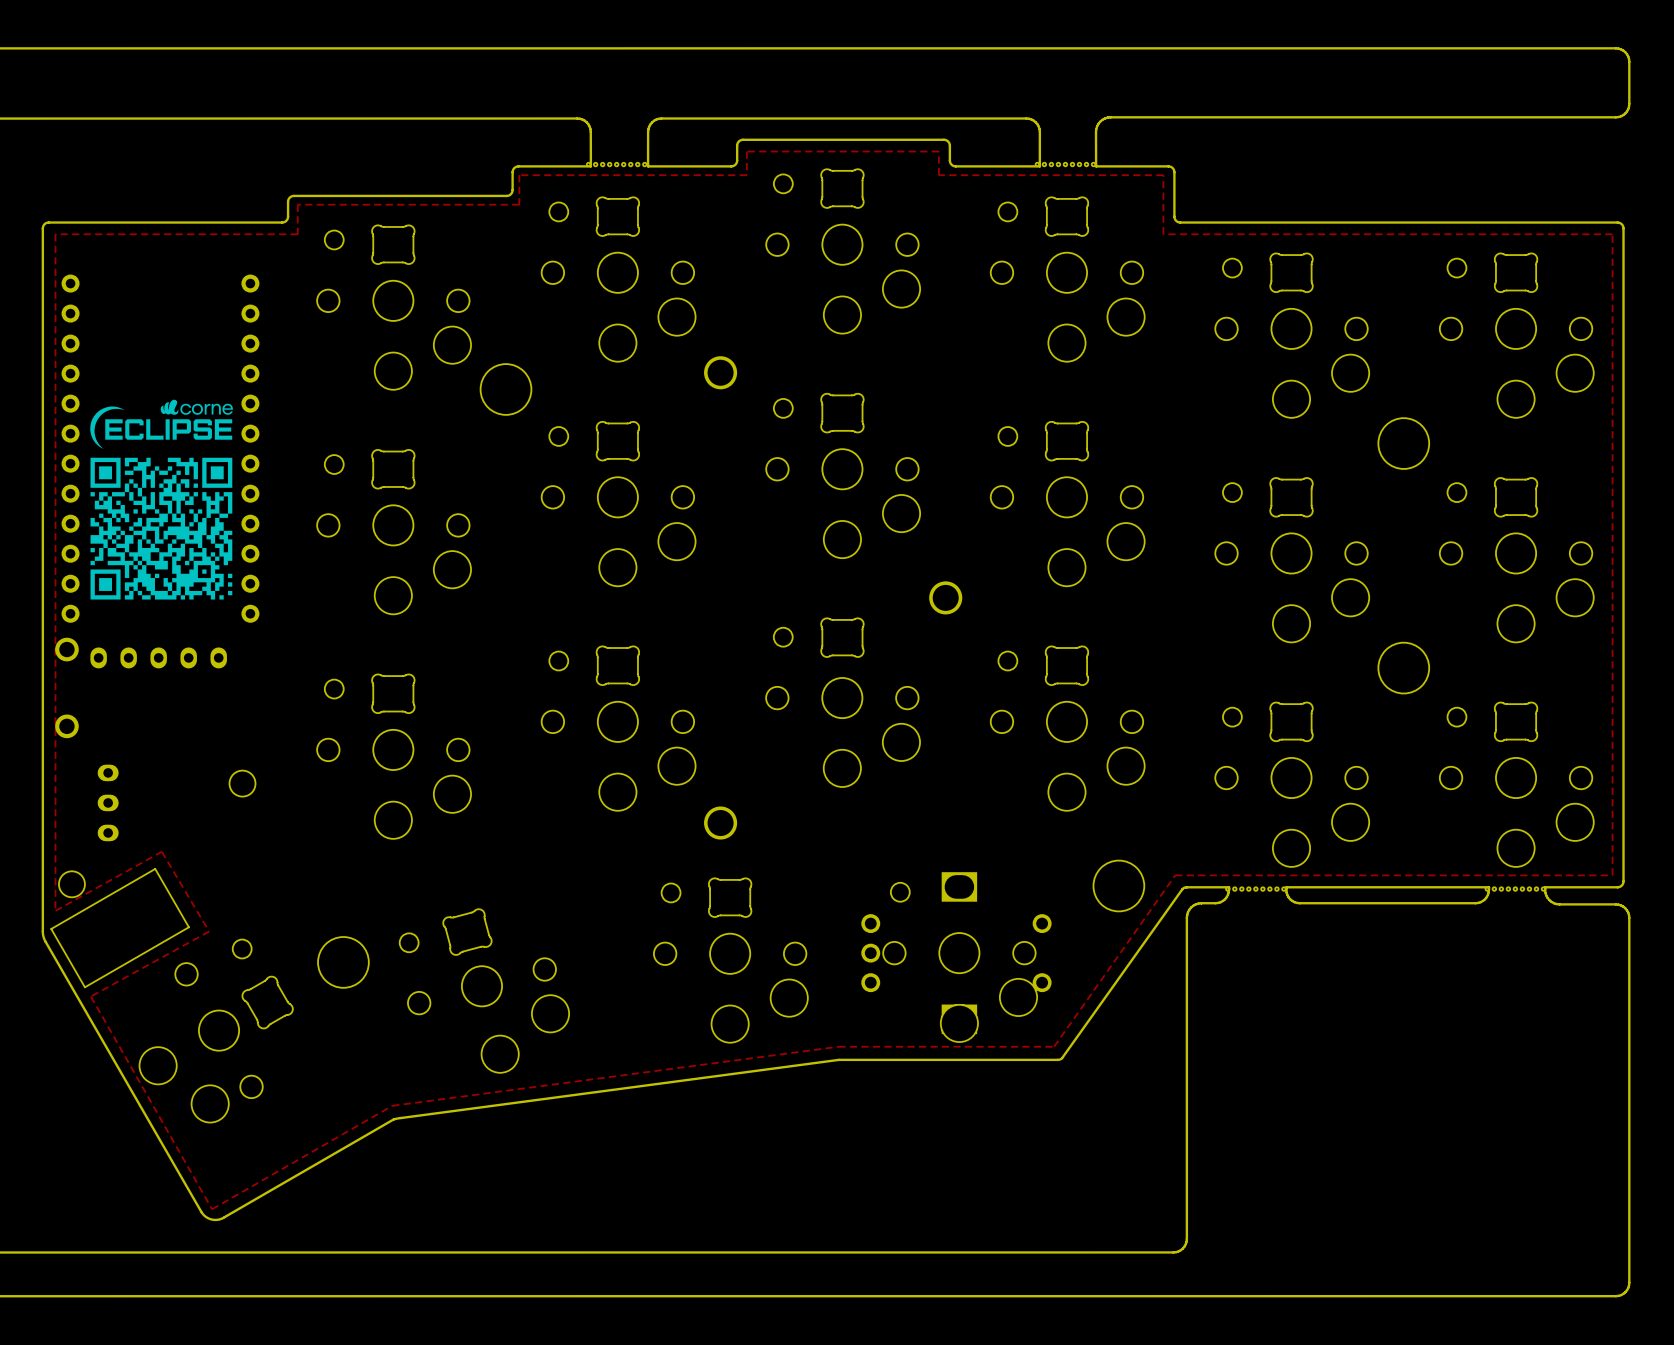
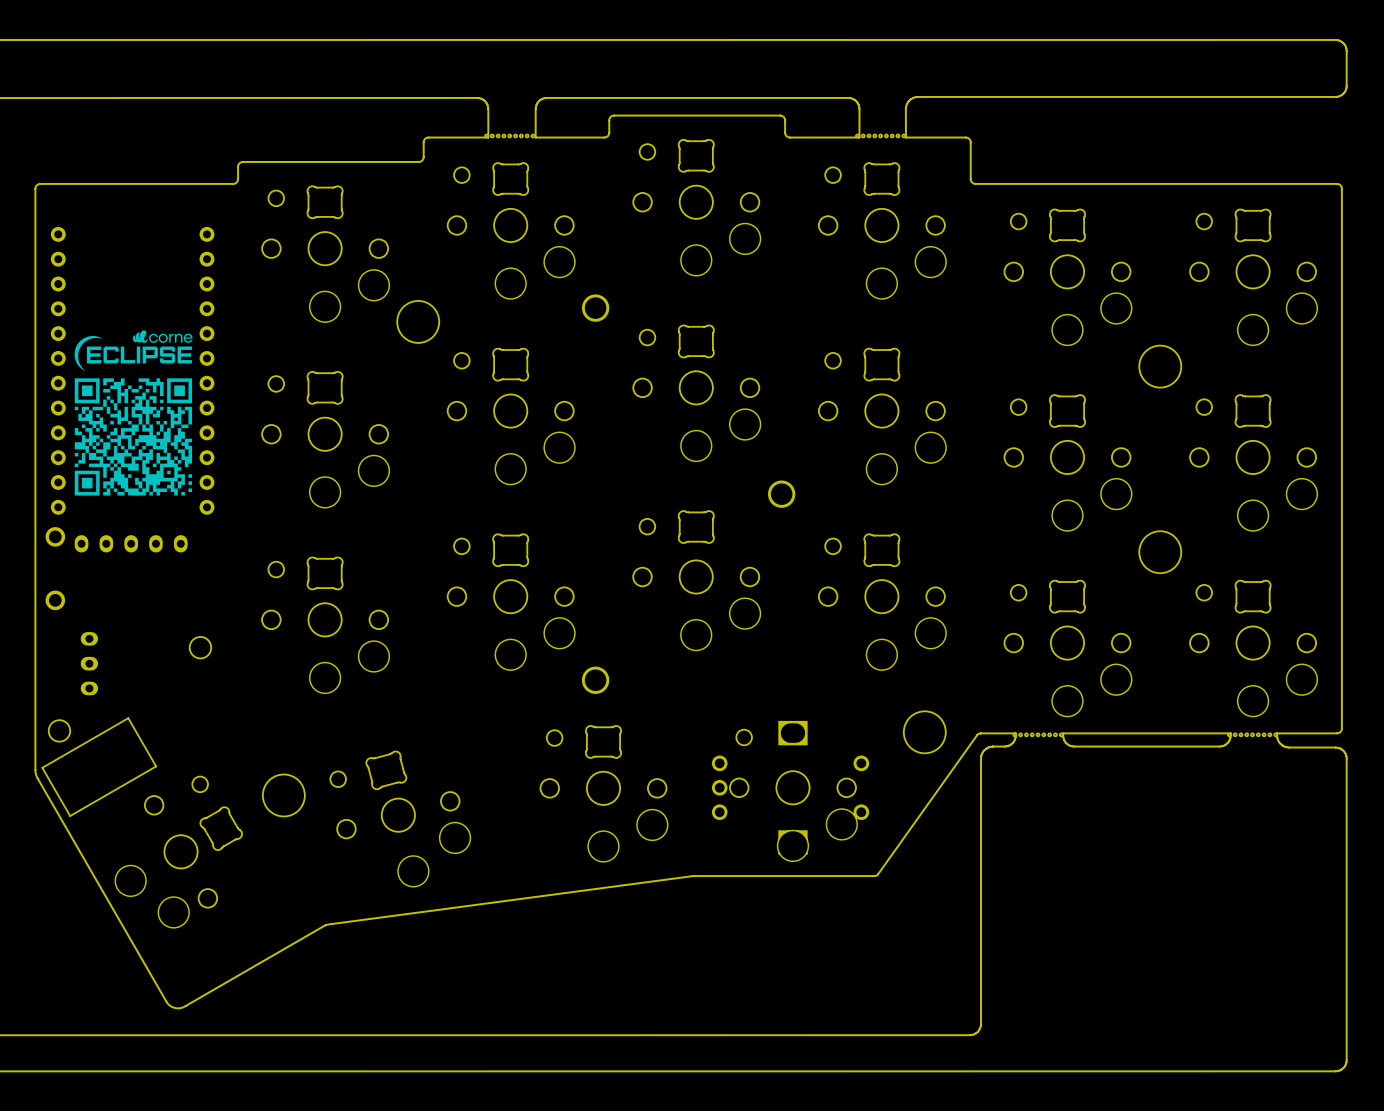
zone outline: (746, 151) (938, 151) (938, 175) (1163, 175) (1163, 234) (1612, 234) (1612, 875) (1175, 875) (1054, 1046) (838, 1046) (392, 1105) (212, 1209) (90, 996) (209, 931) (161, 851) (55, 910) (55, 234) (297, 234) (297, 204) (519, 204) (519, 175) (746, 175) (746, 151) -> none

